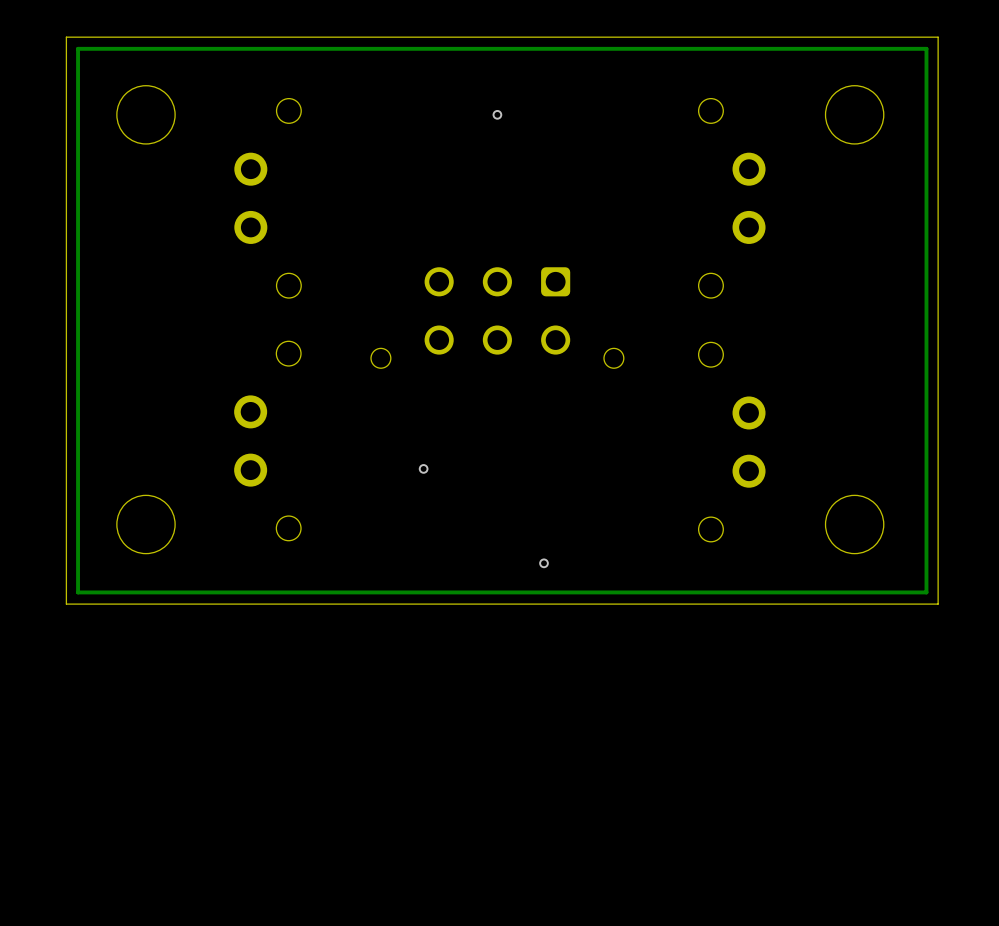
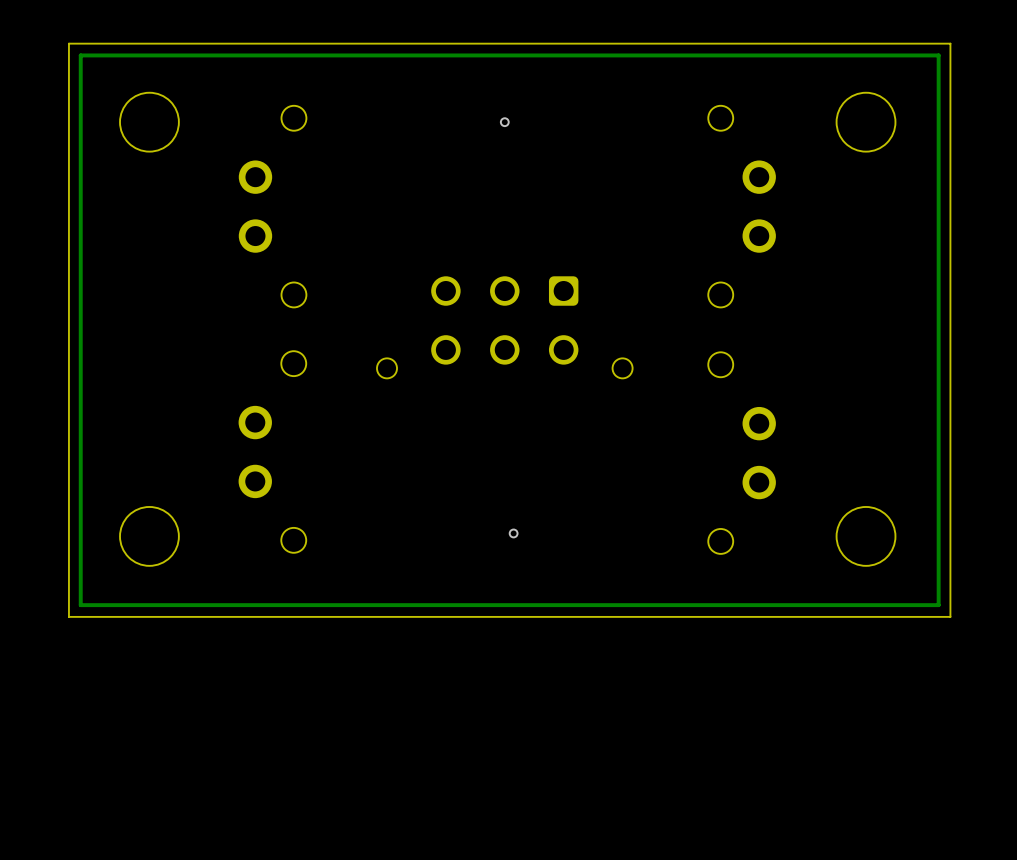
via: (423, 468) -> none
via: none -> (513, 533)
via: (544, 563) -> none

